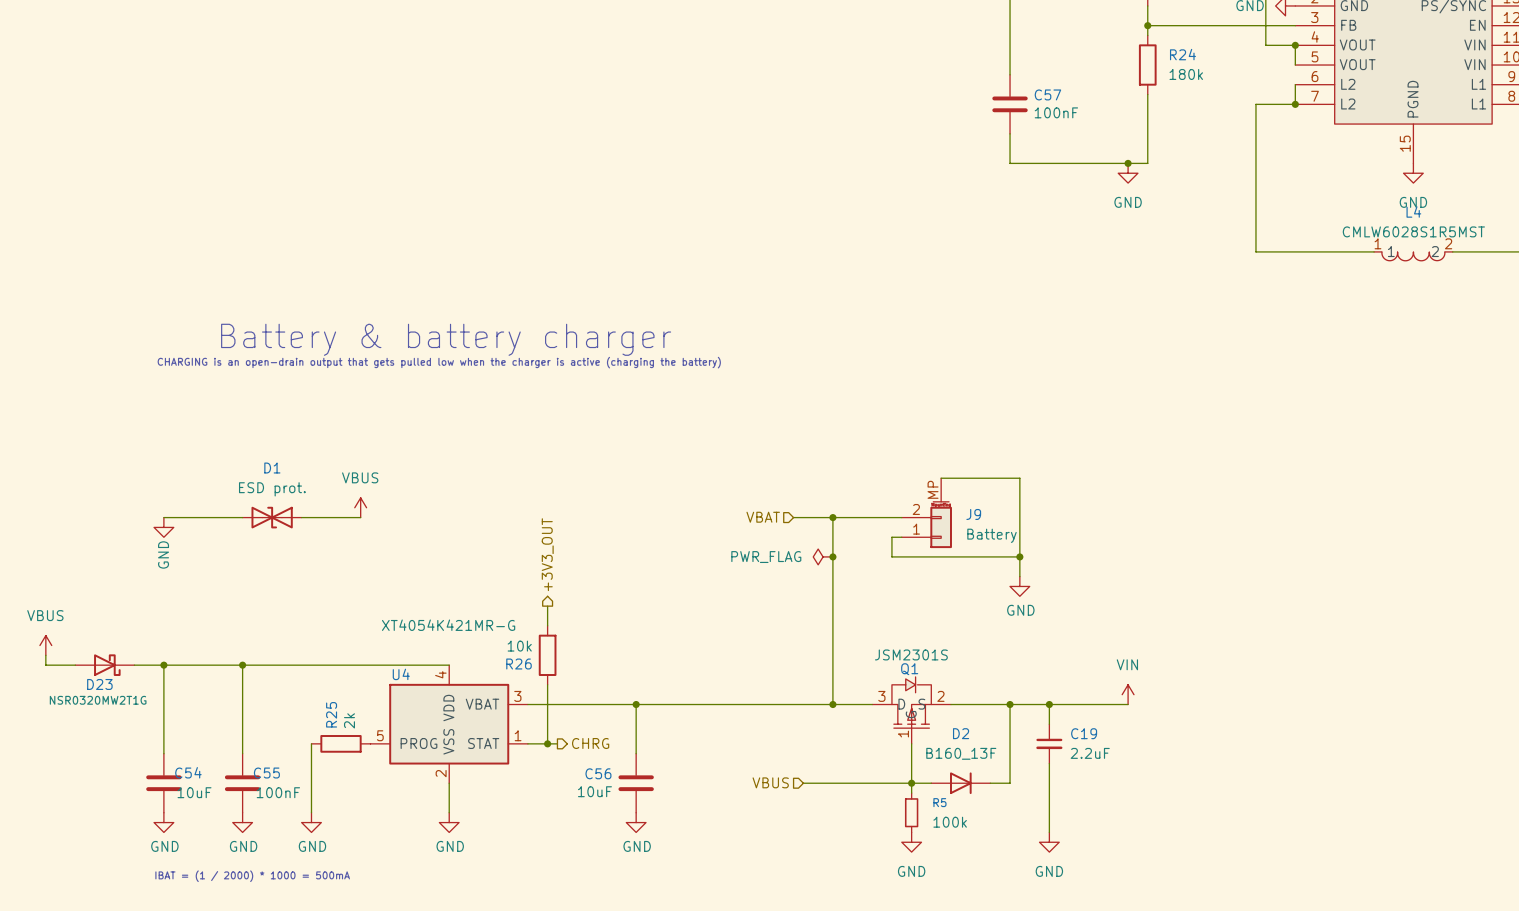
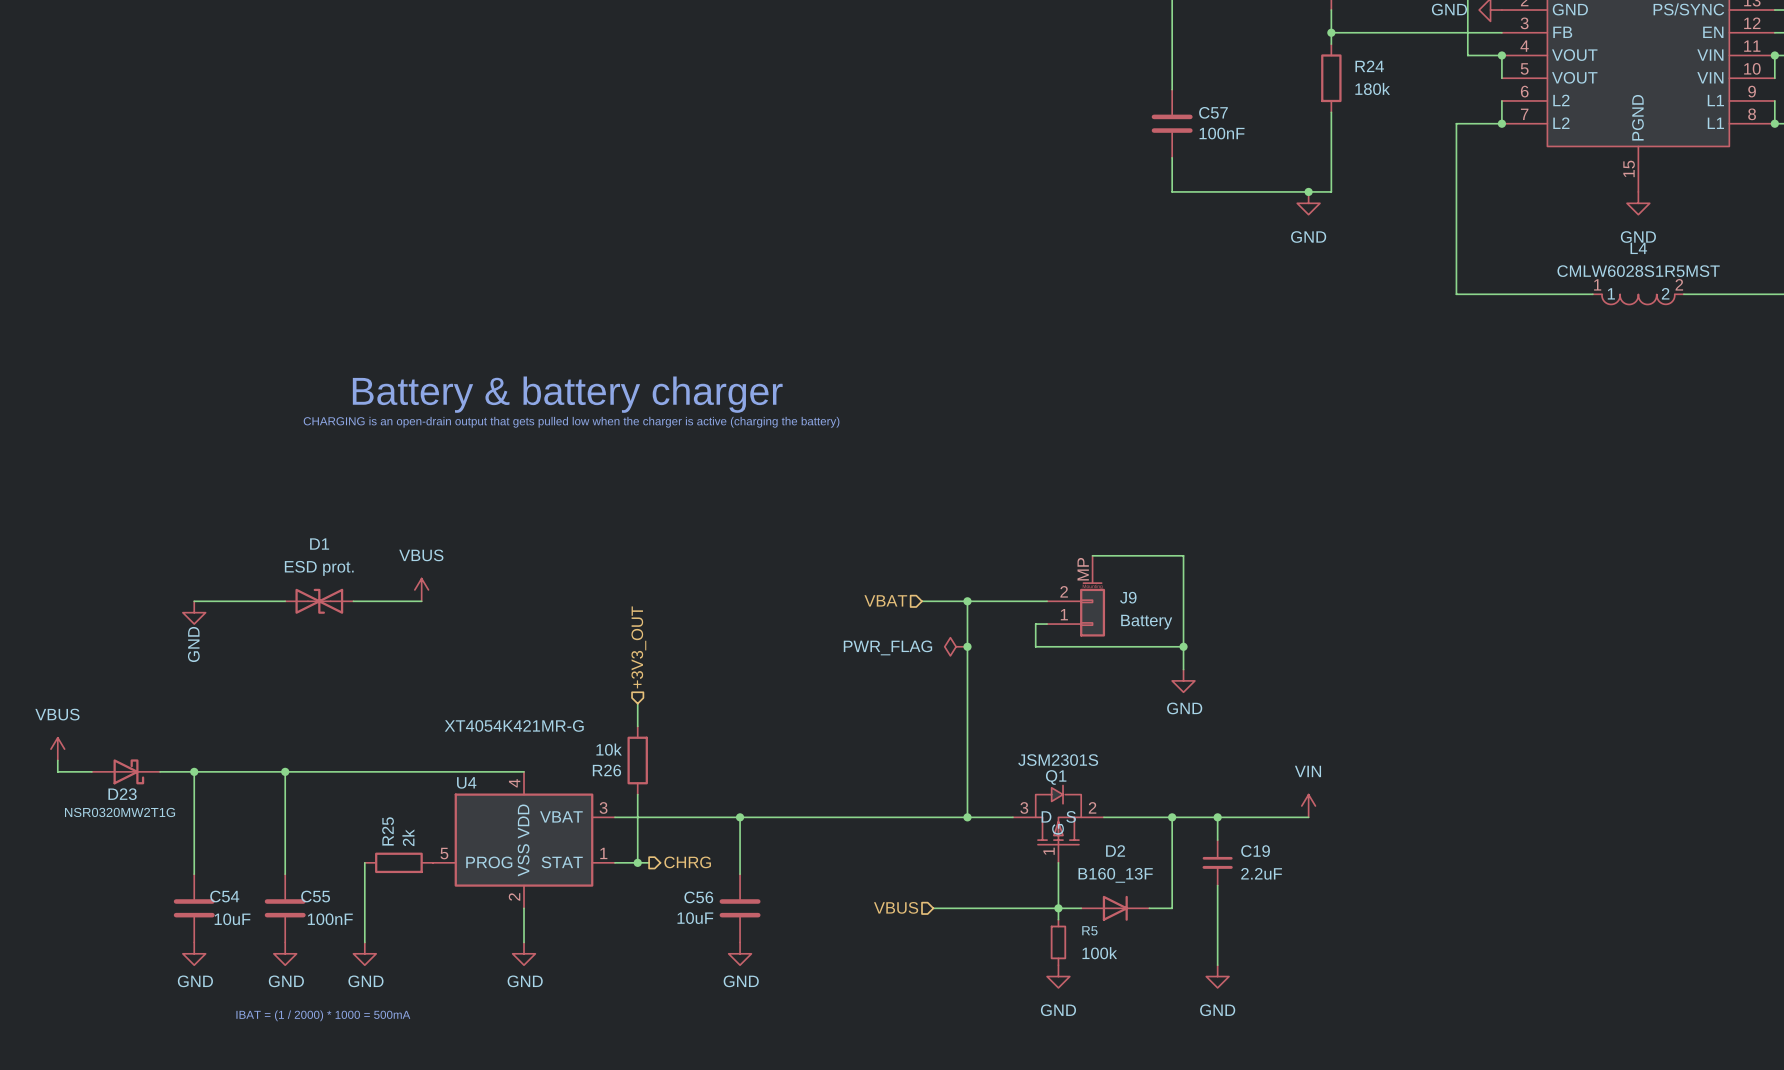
hierarchical label shape: output (547, 554) -> input (638, 647)

